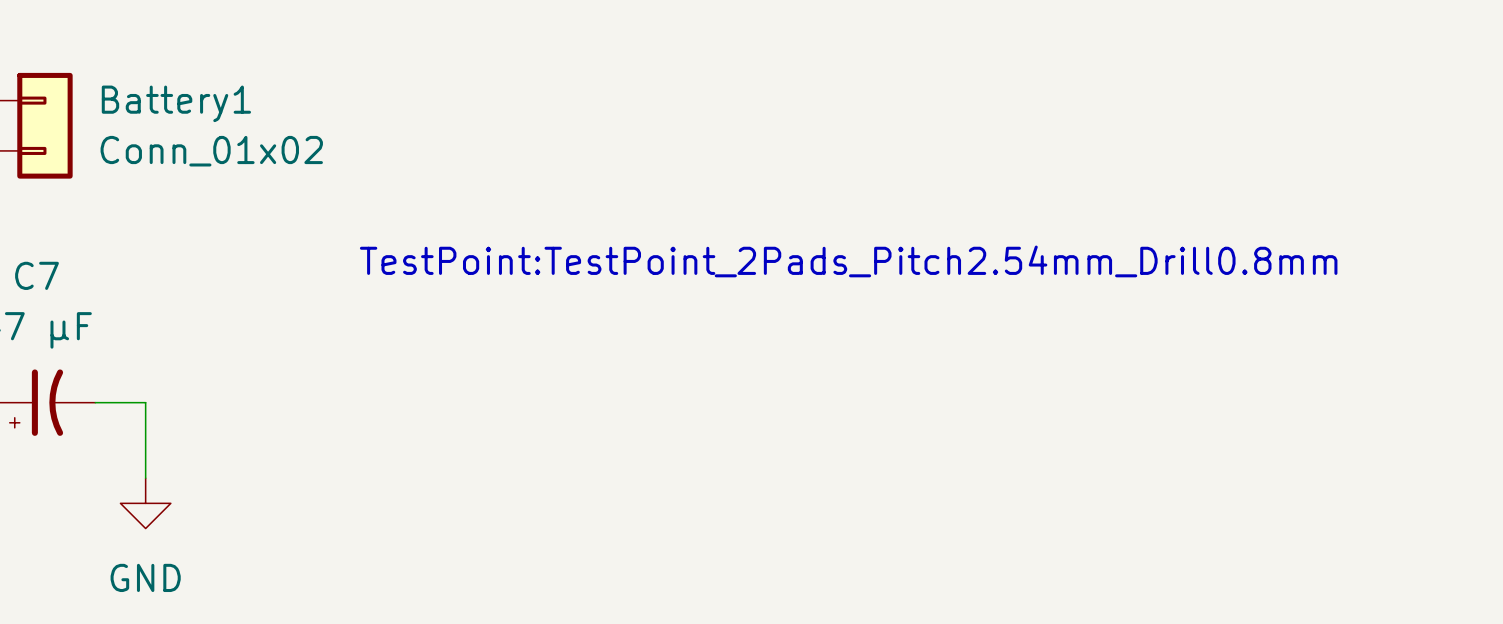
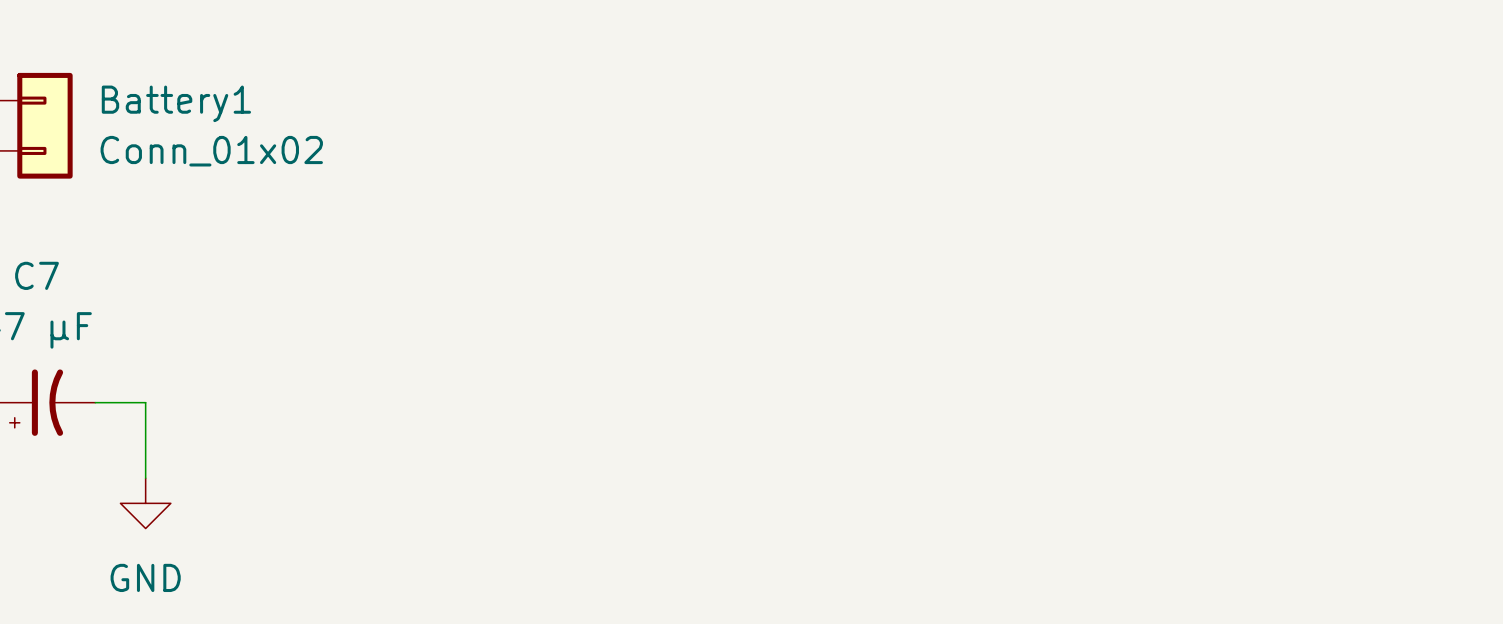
text: TestPoint:TestPoint_2Pads_Pitch2.54mm_Drill0.8mm (848, 261) -> none

